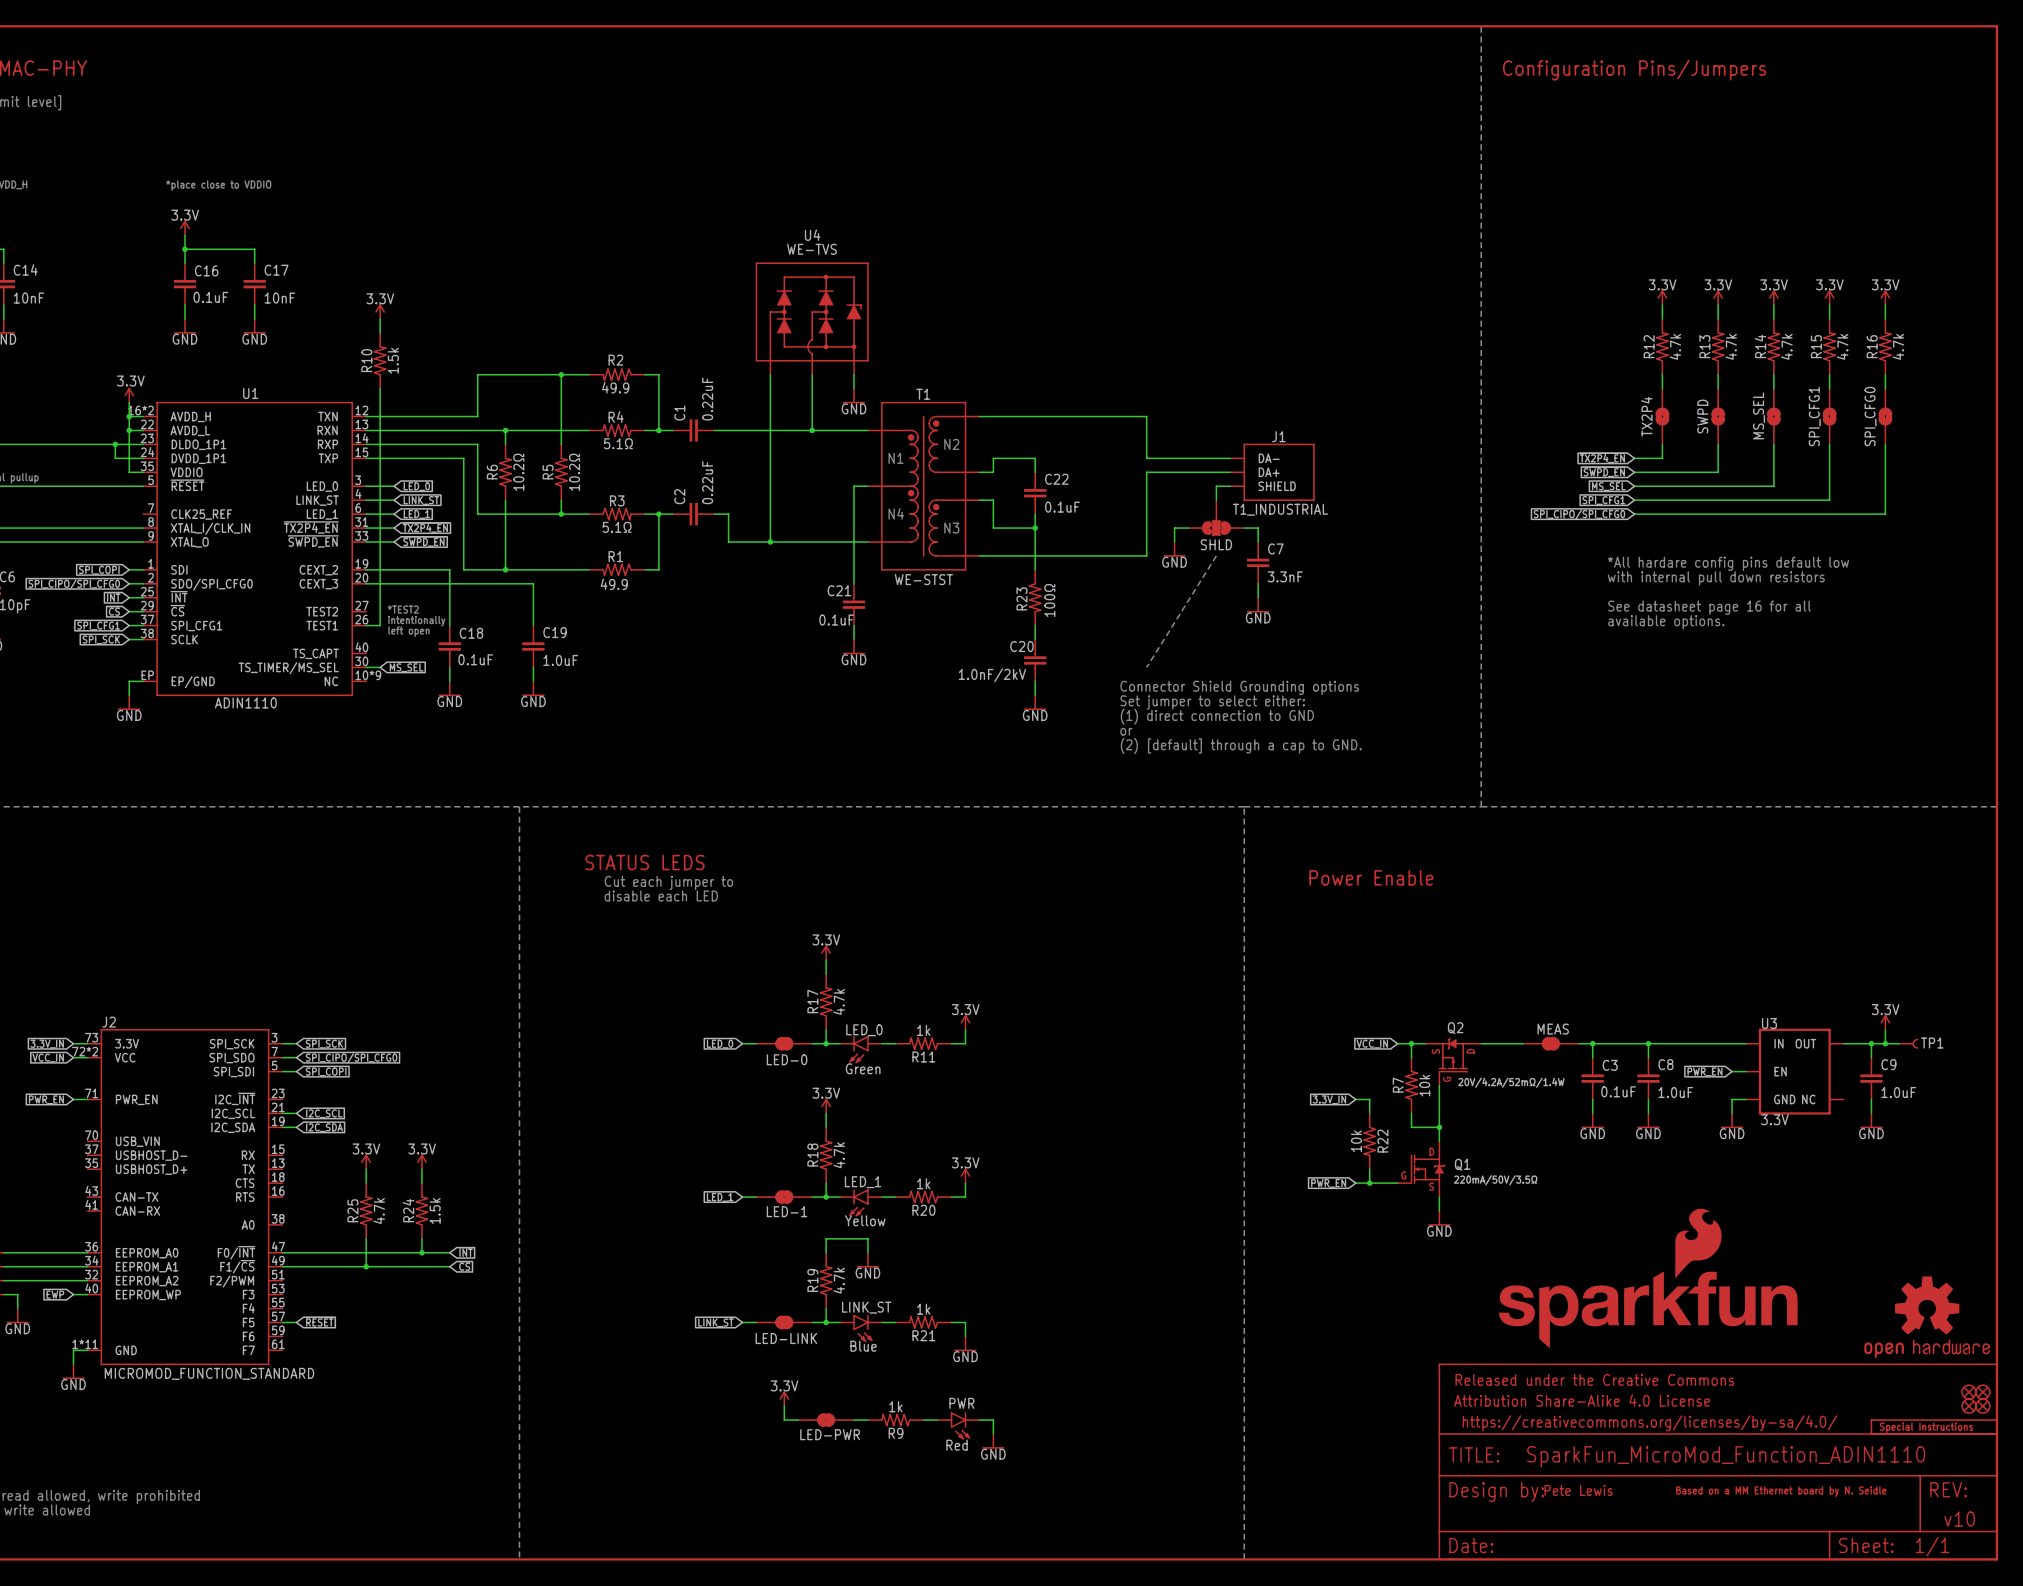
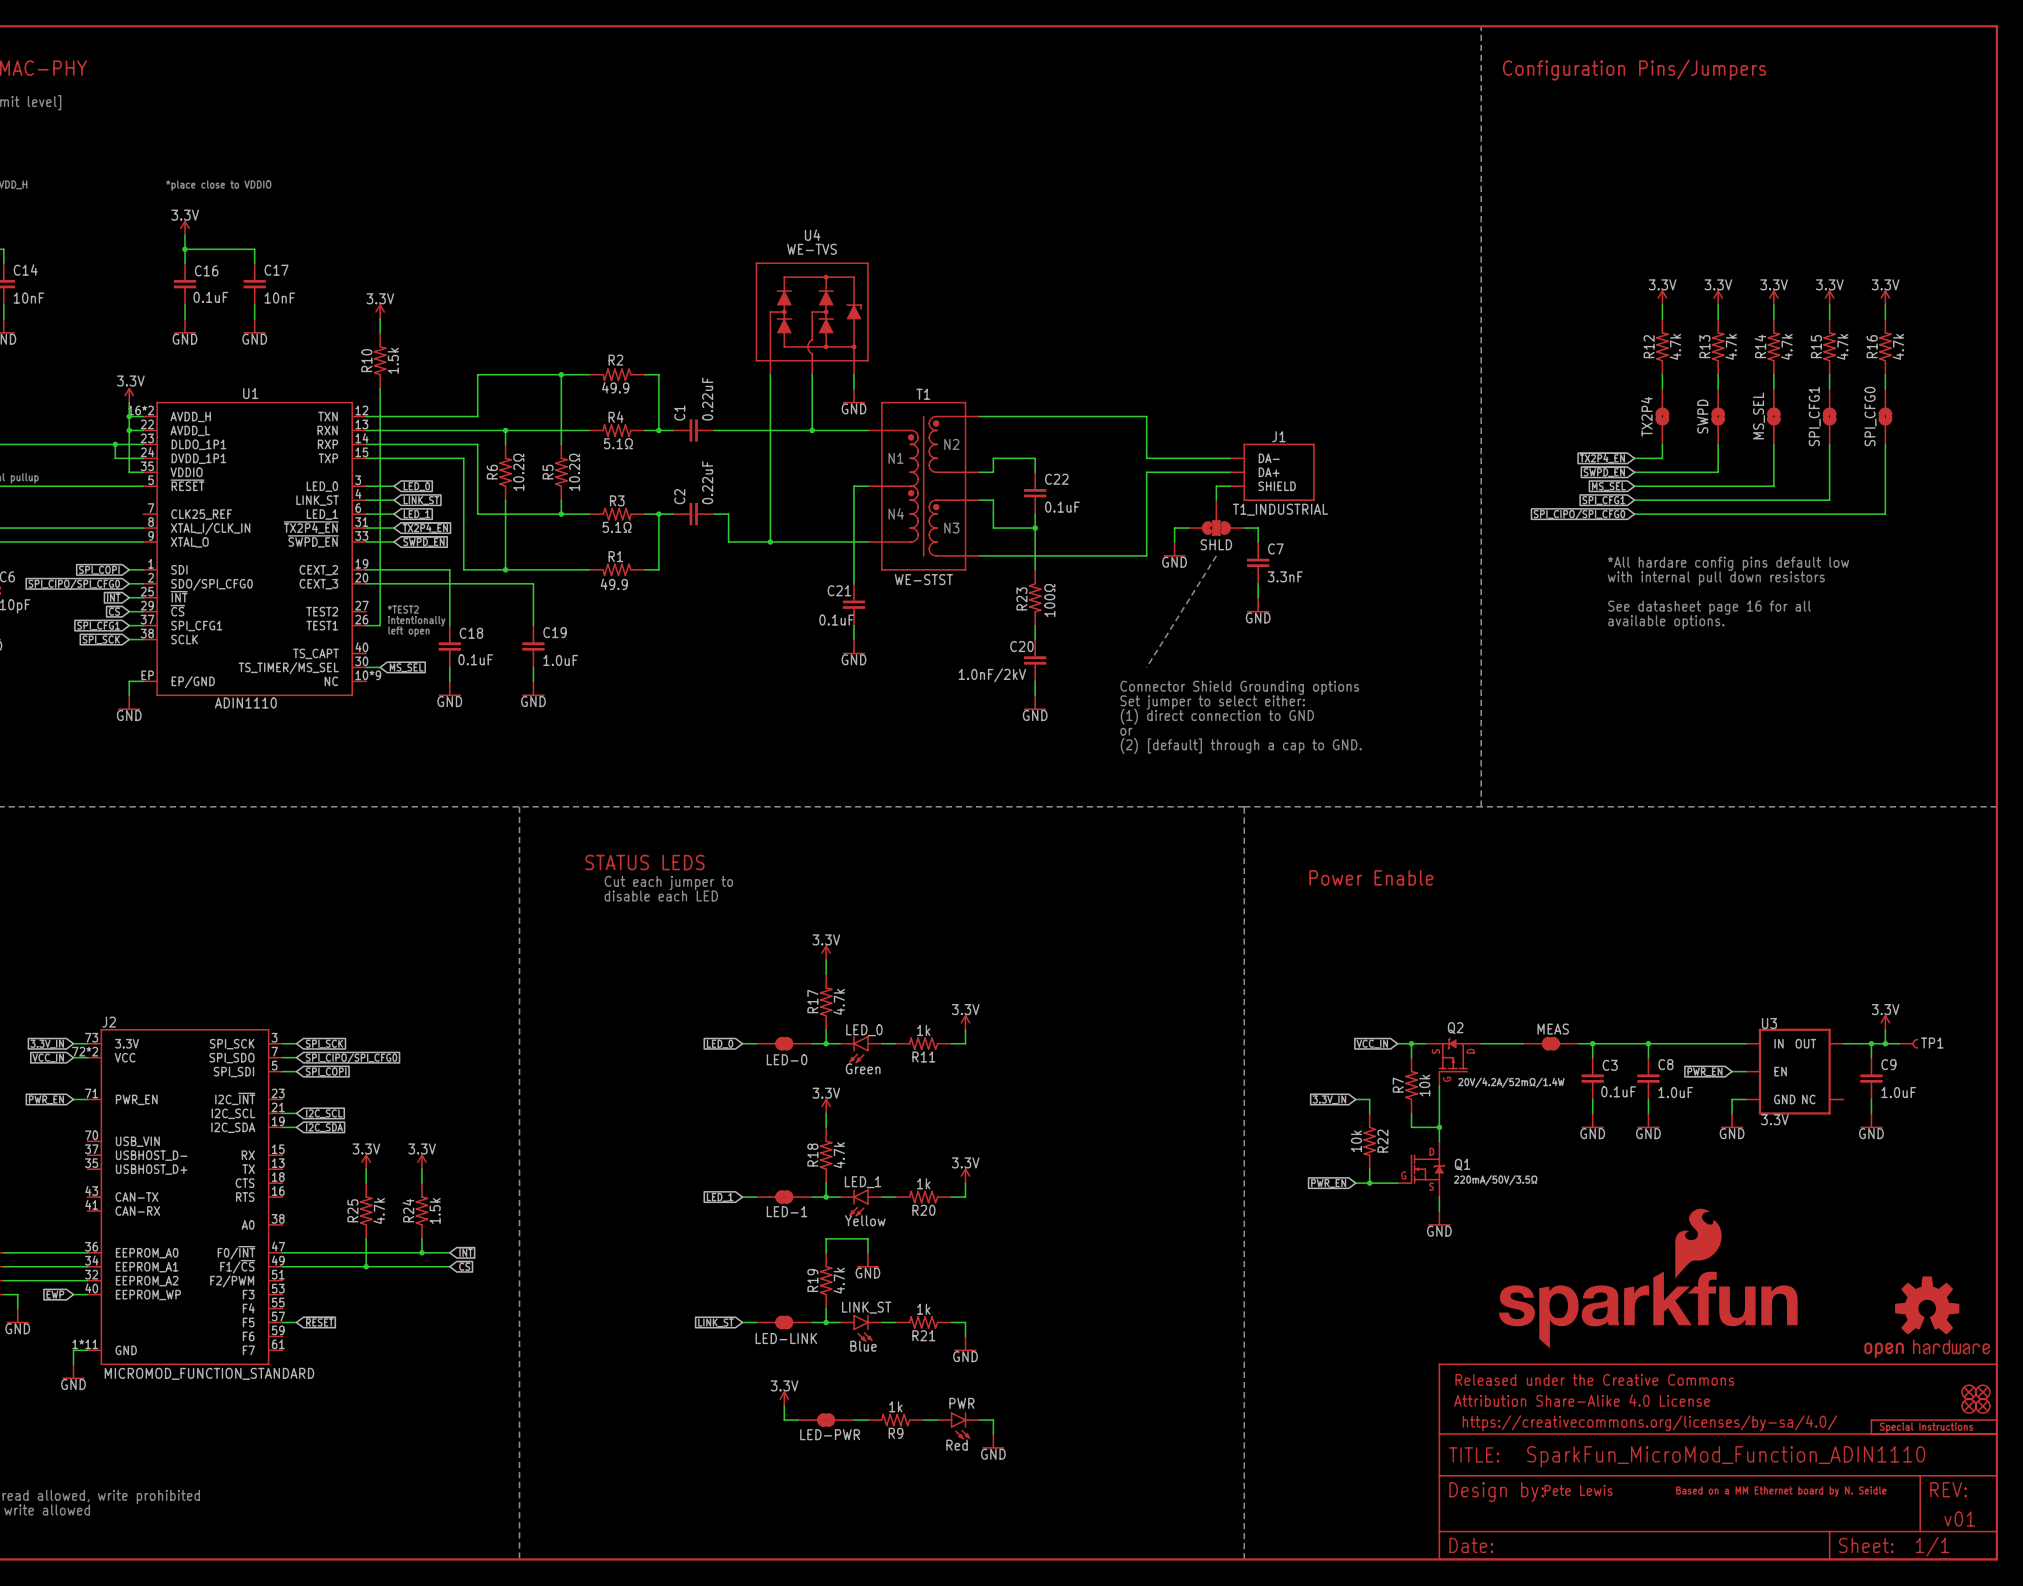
text: v10 (1959, 1519) -> v01 (1959, 1519)

